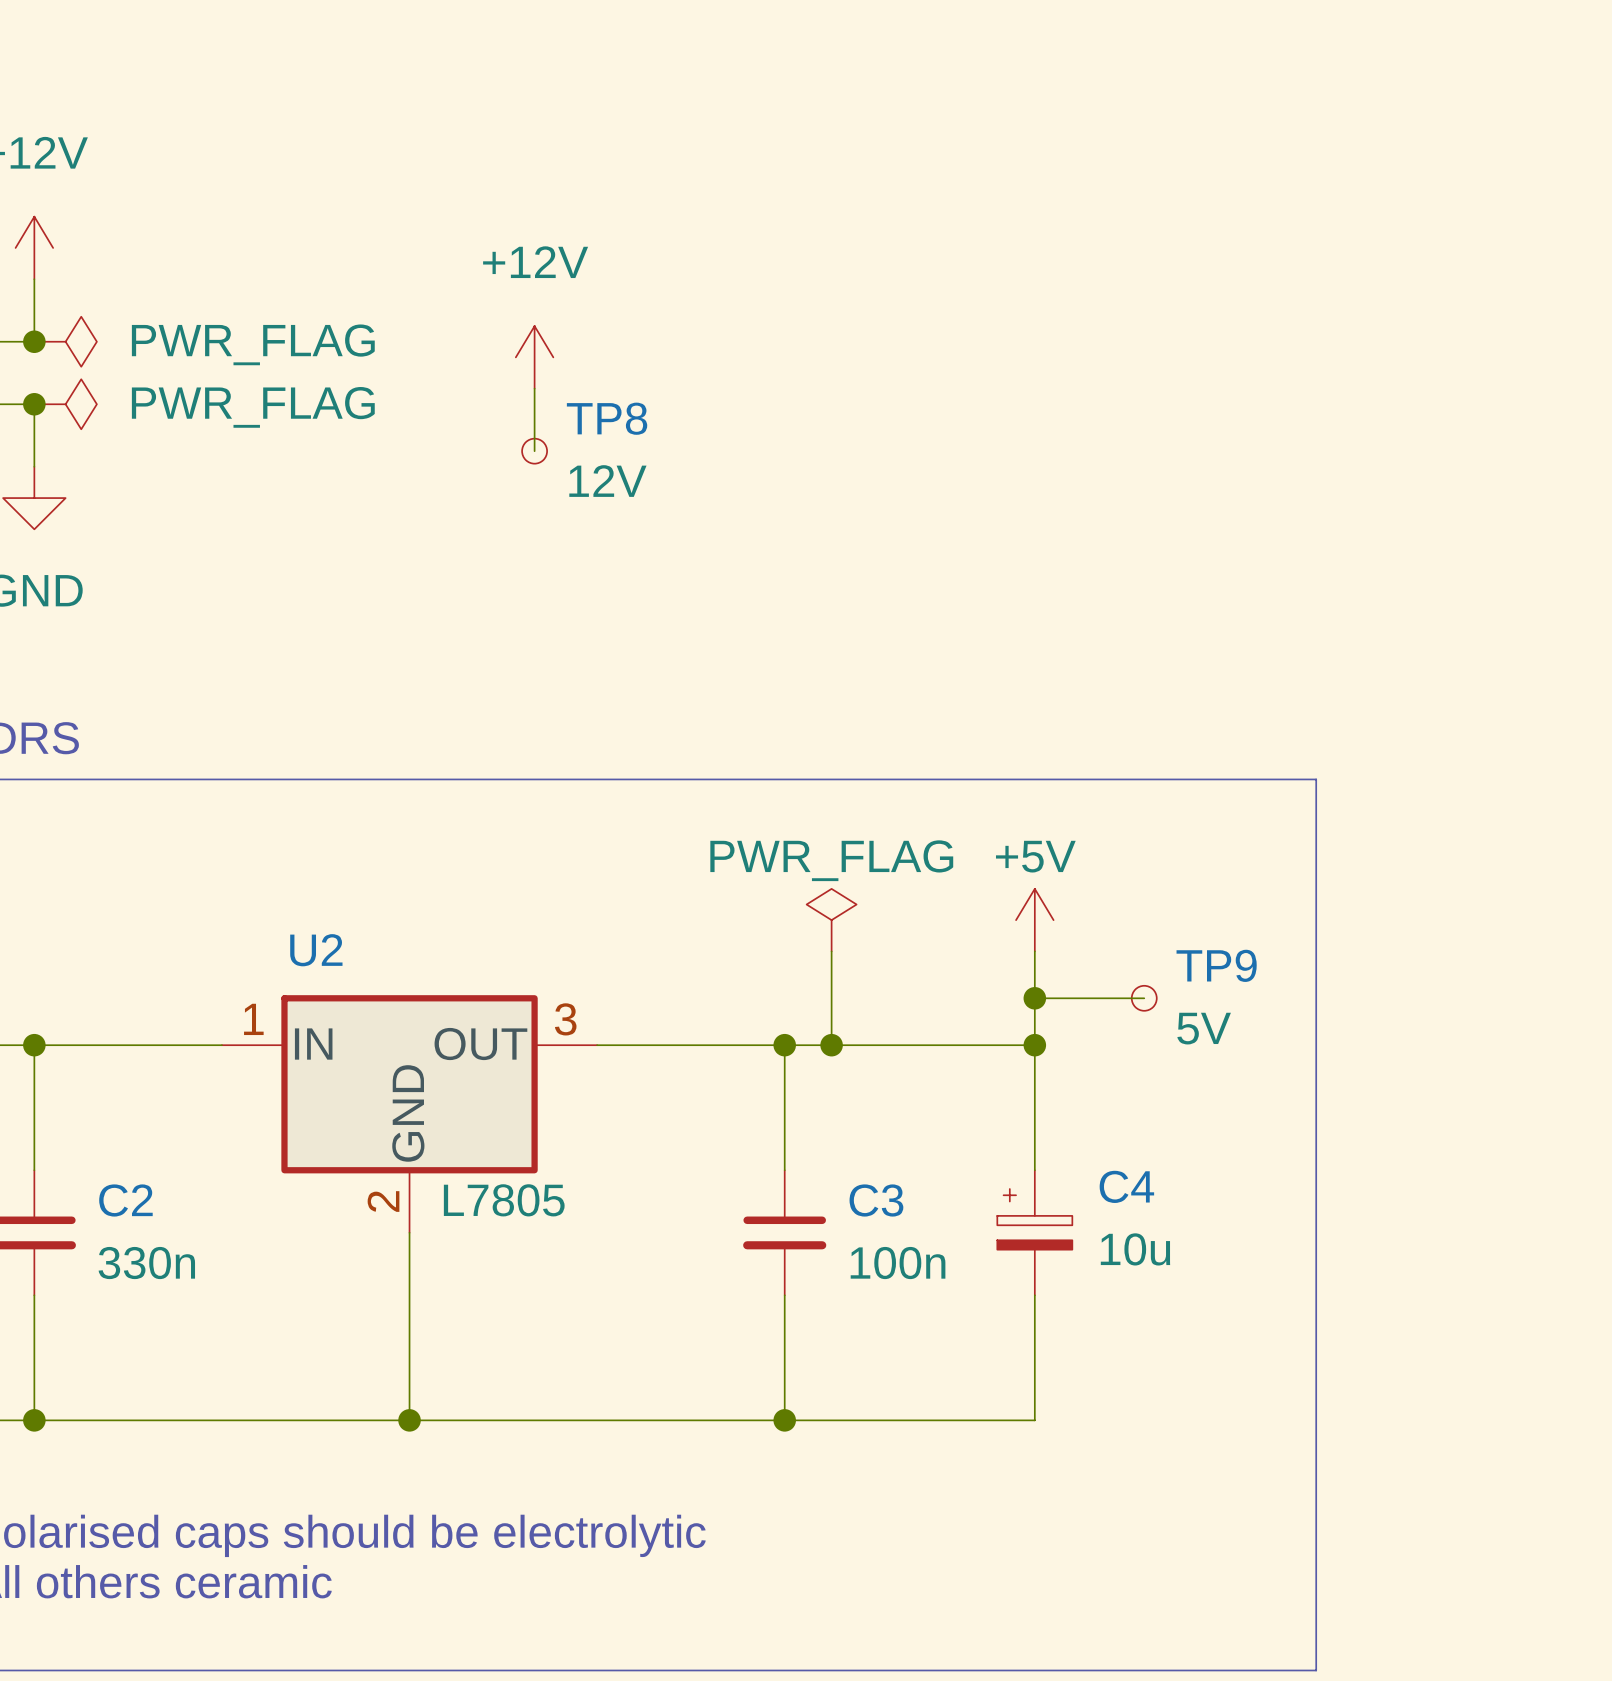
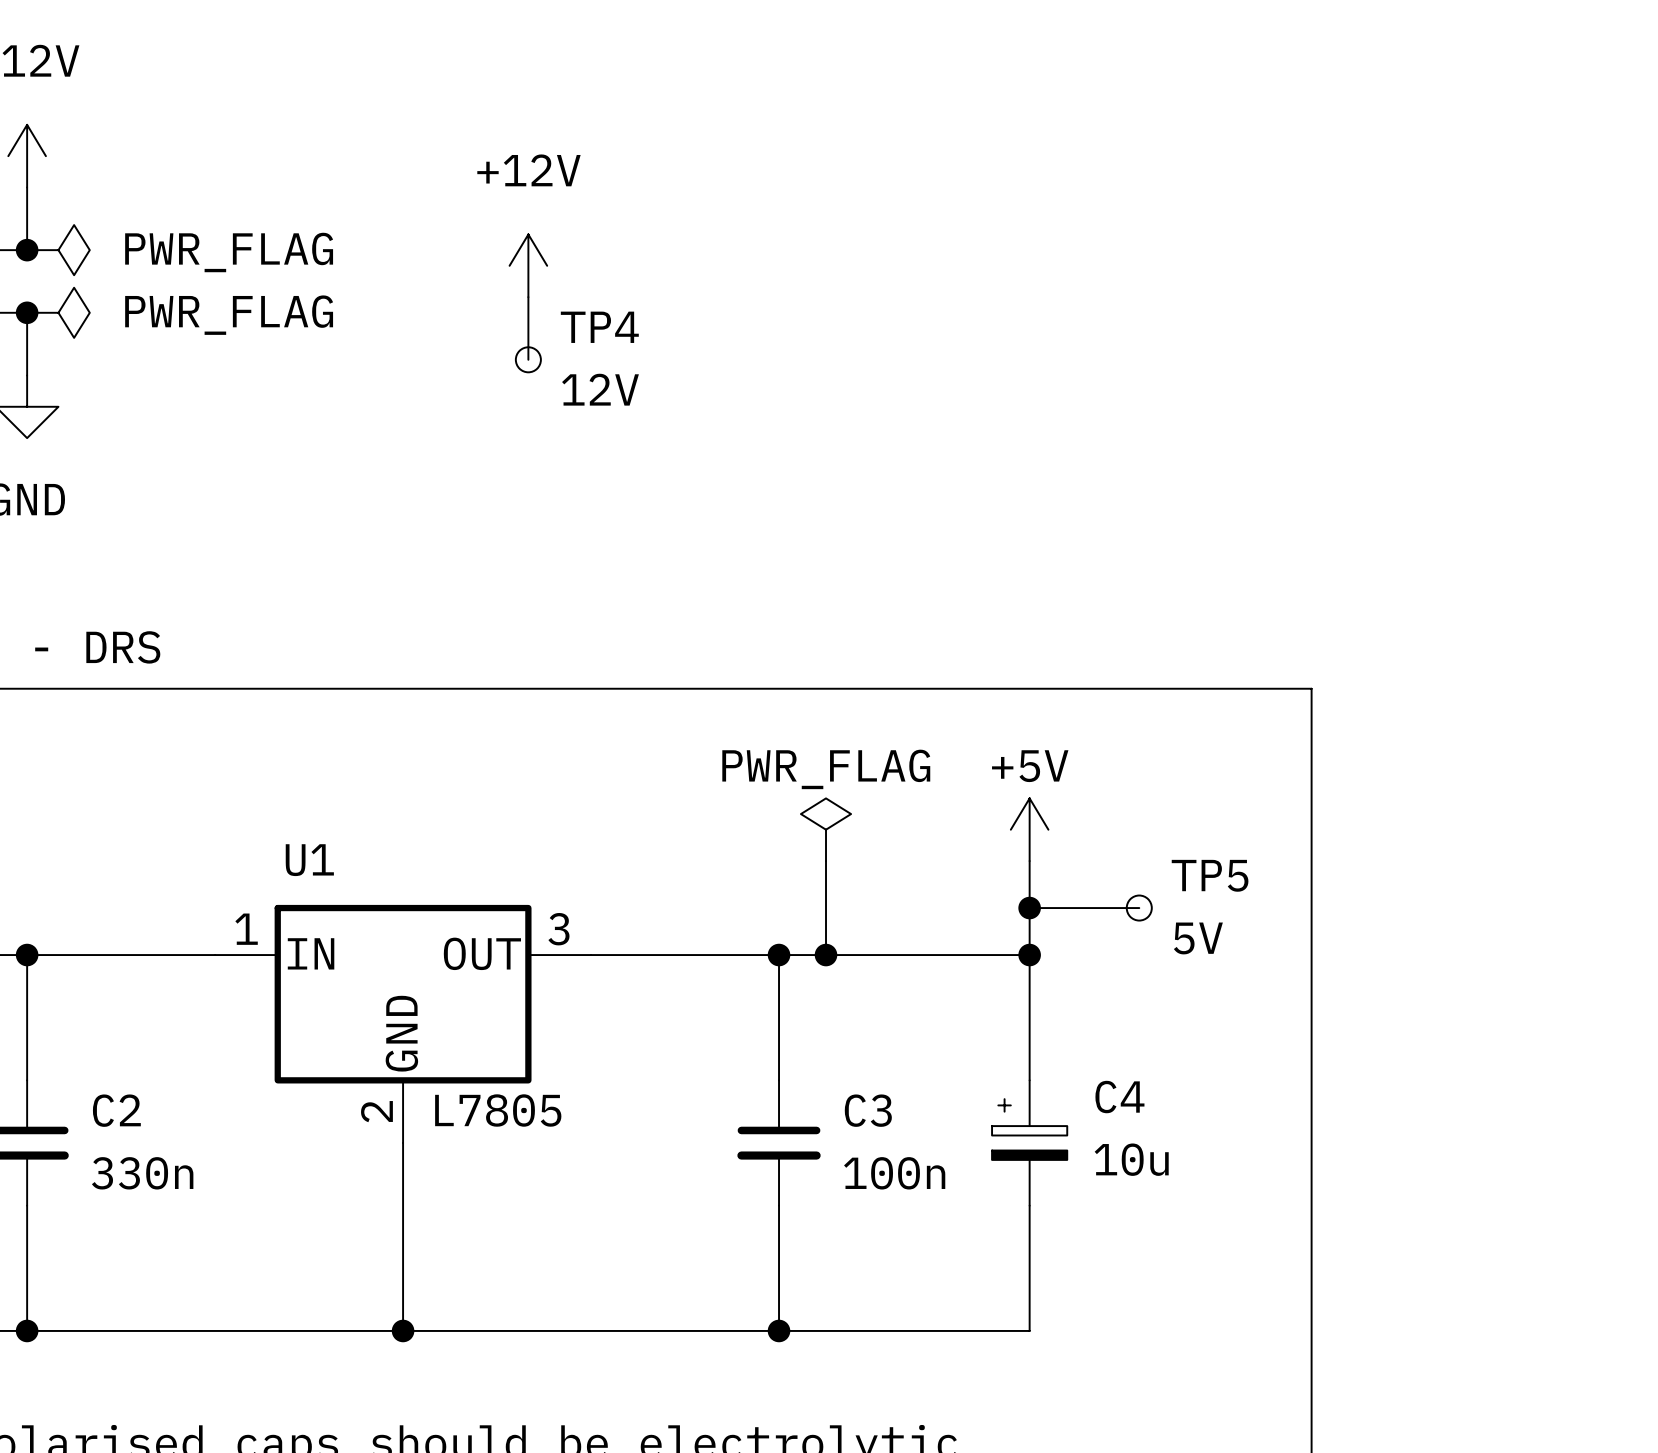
TP8 name: TP8 (607, 418) -> TP4 (599, 327)
U2 name: U2 (316, 950) -> U1 (309, 860)
TP9 name: TP9 (1216, 965) -> TP5 (1210, 875)

